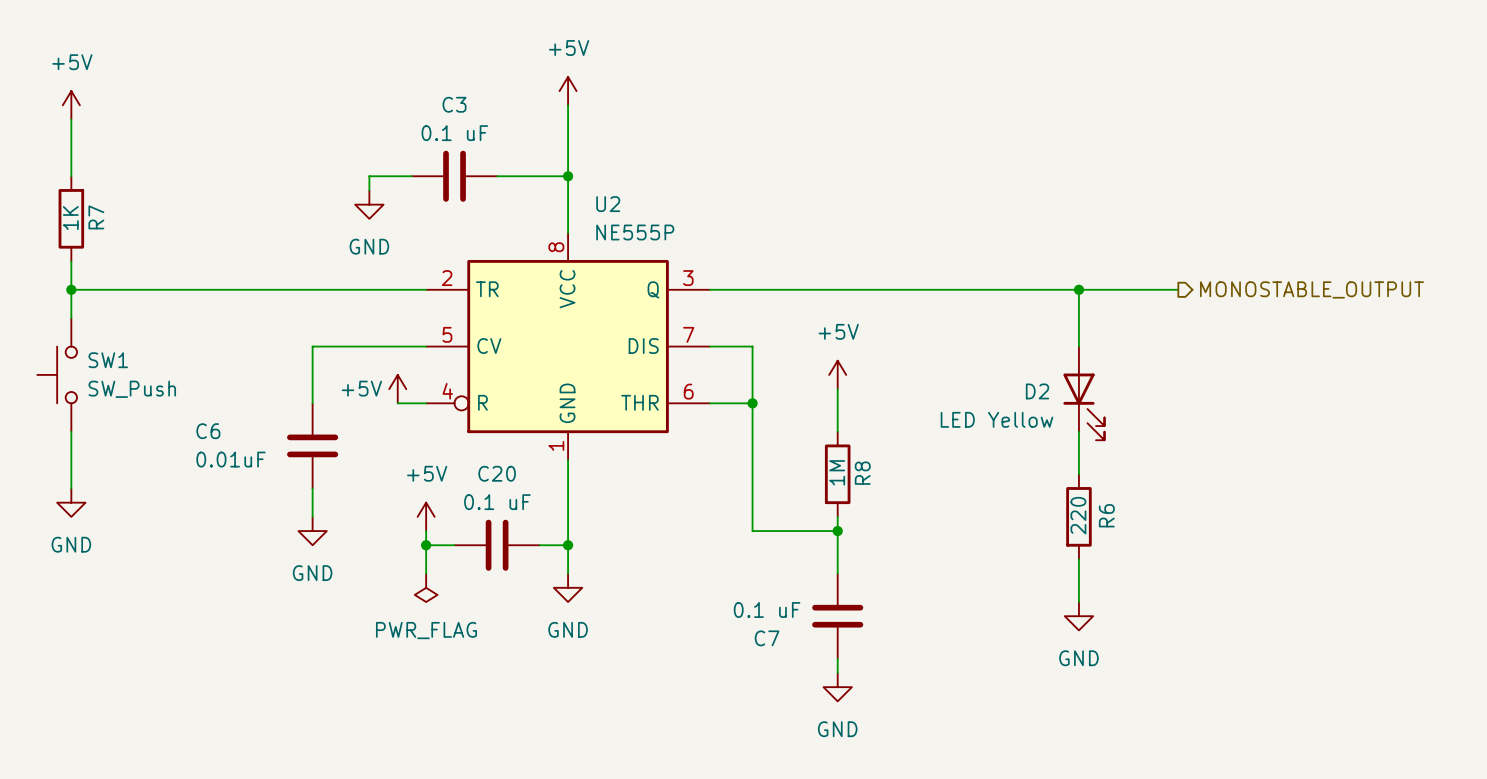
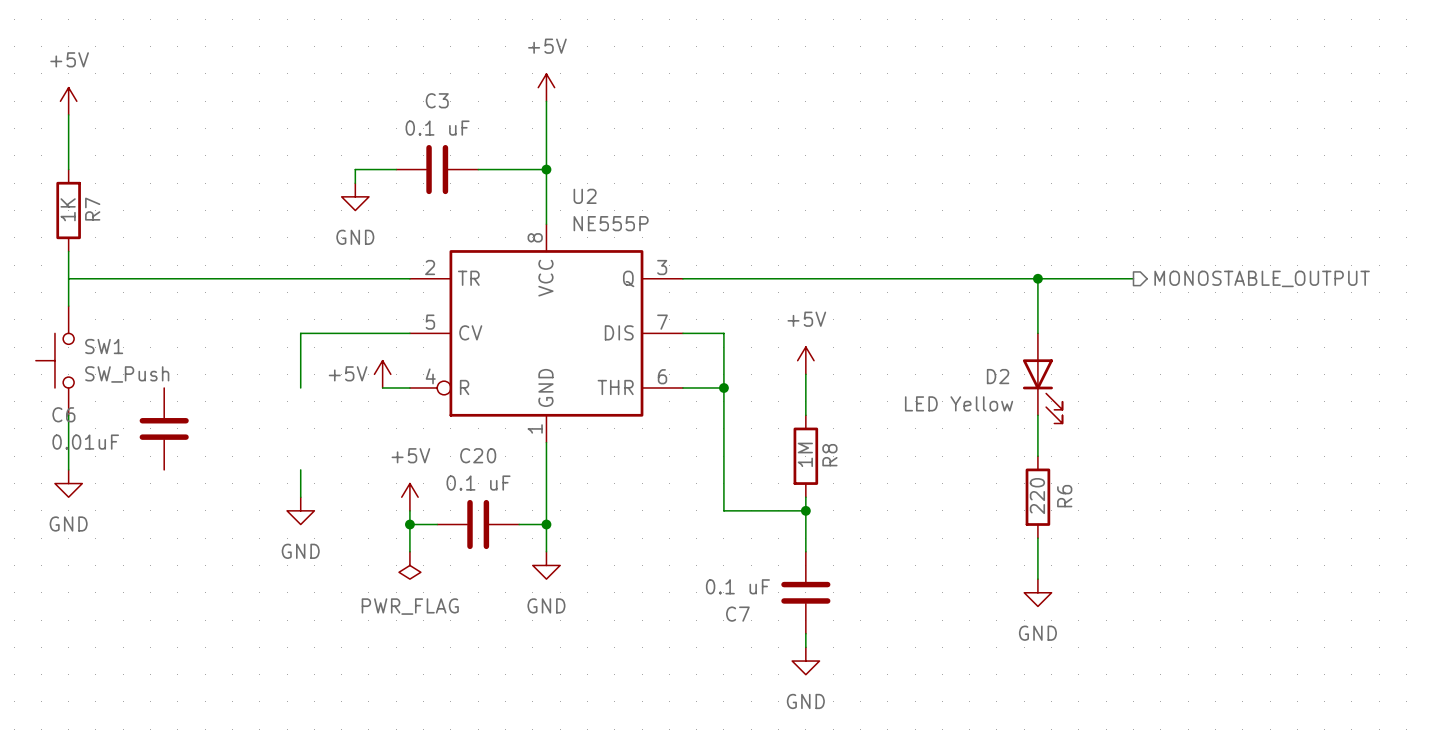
junction: (71, 289) -> none
C6 position: (312, 445) -> (164, 428)

